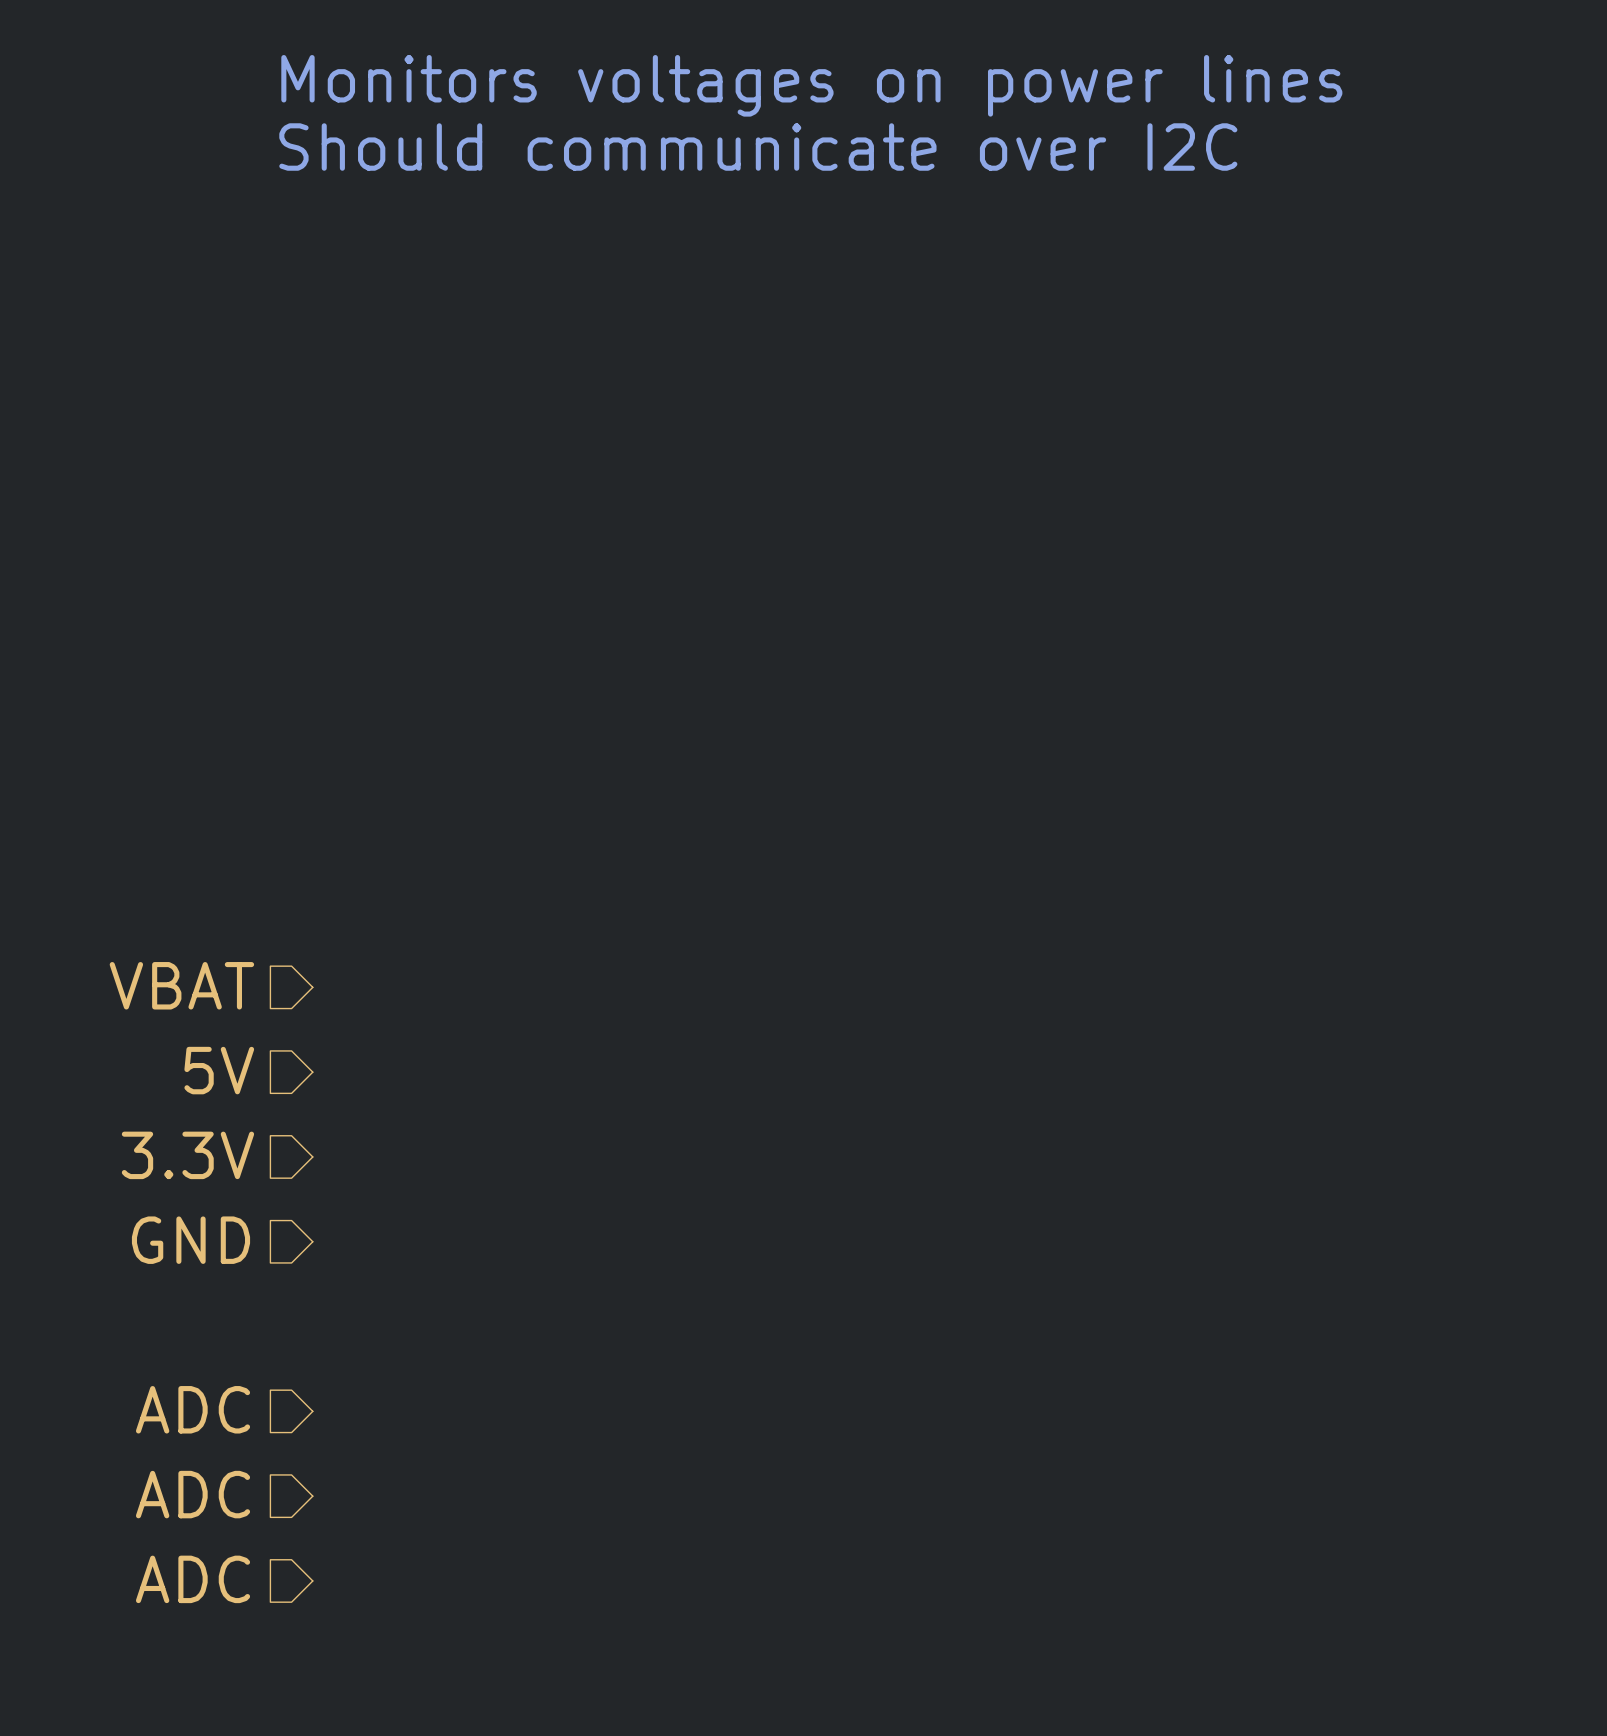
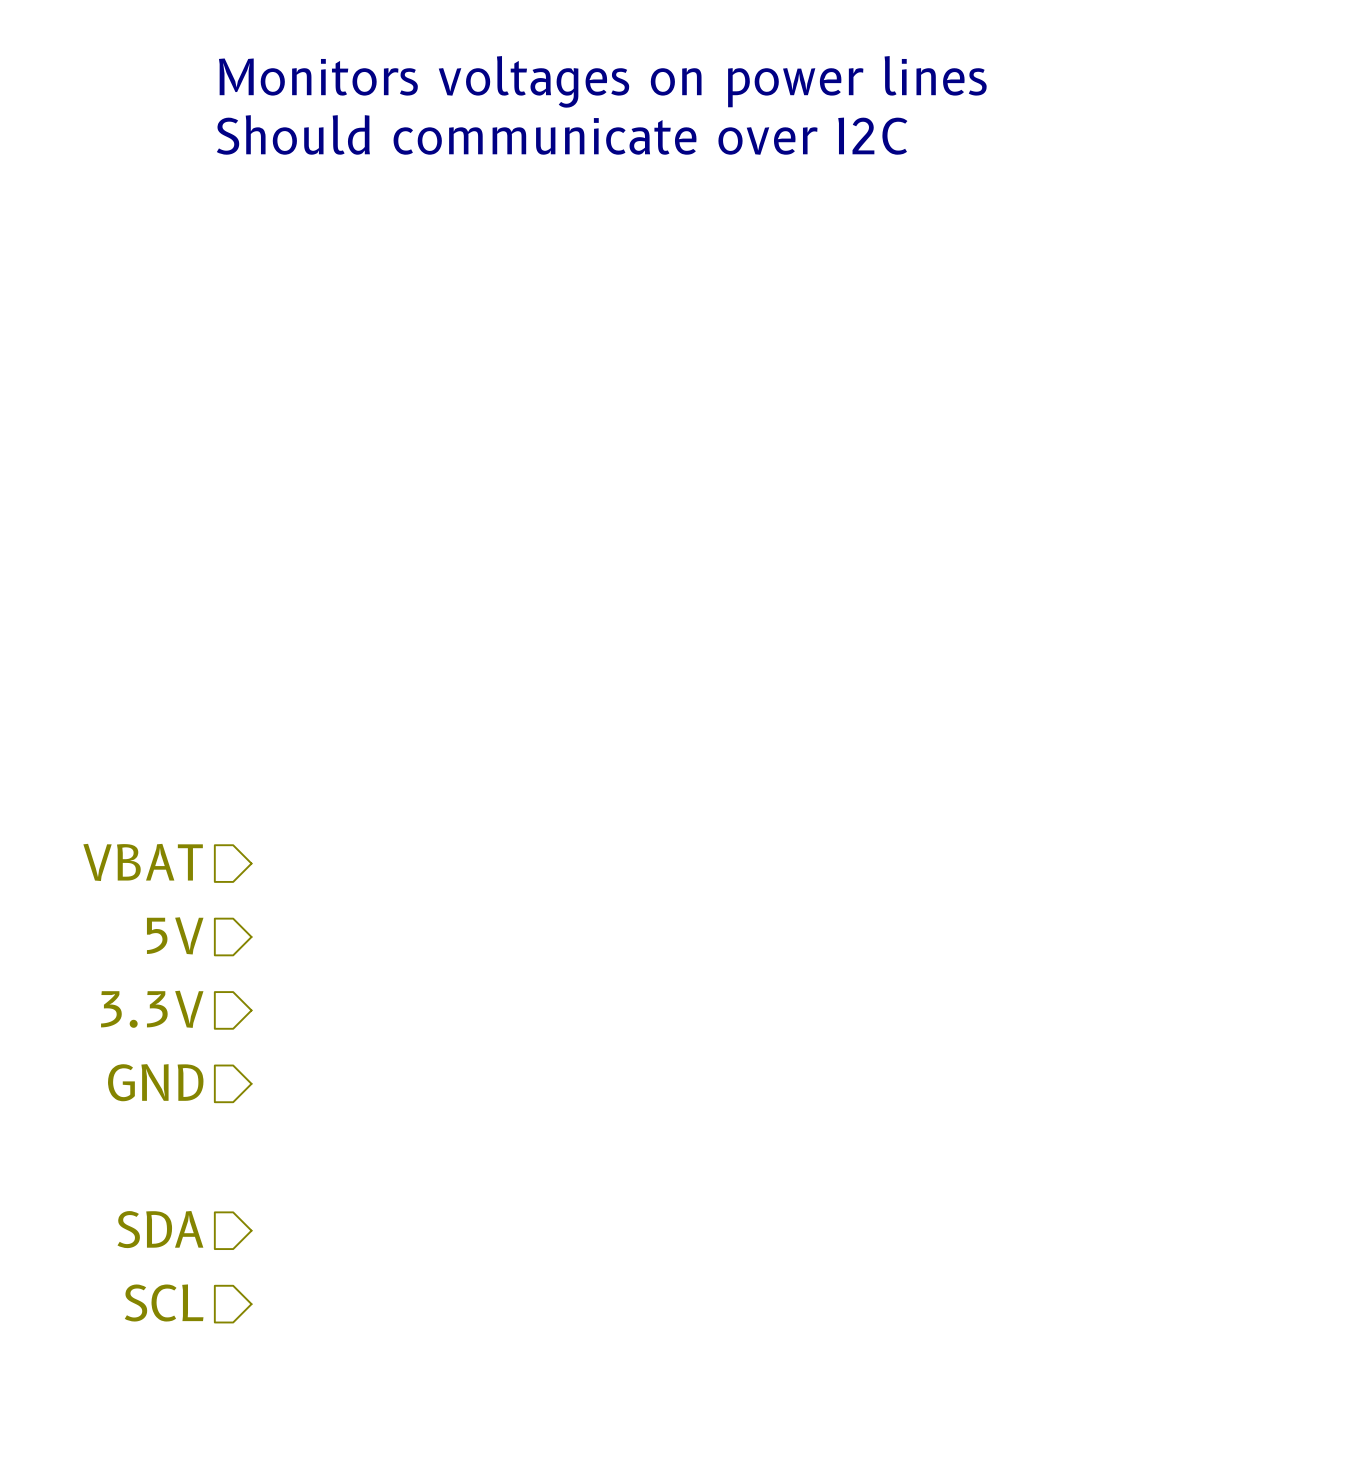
hierarchical label: ADC (193, 1409) -> SDA (160, 1229)
hierarchical label: ADC (193, 1494) -> SCL (164, 1302)
hierarchical label: ADC (193, 1579) -> none

